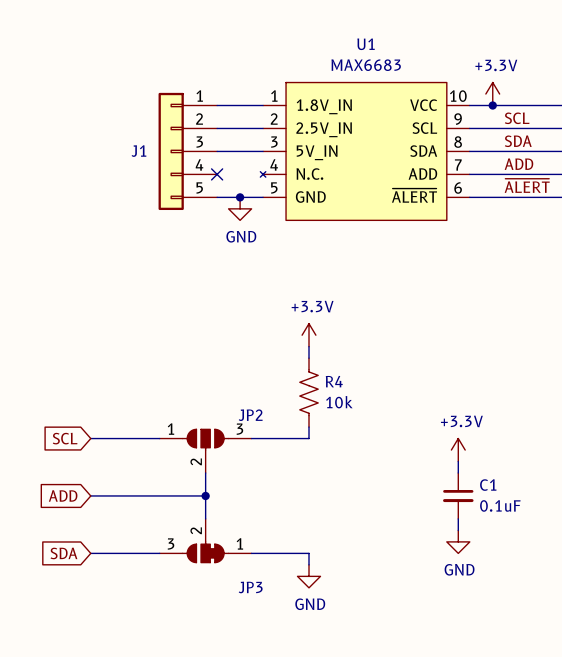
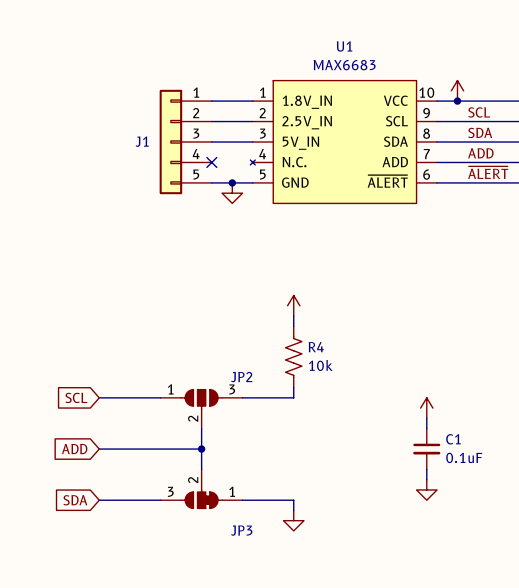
power symbol text: +3.3V (496, 65) -> none
power symbol text: GND (241, 236) -> none
power symbol text: +3.3V (312, 306) -> none
power symbol text: +3.3V (461, 421) -> none
power symbol text: GND (459, 569) -> none
power symbol text: GND (310, 604) -> none

